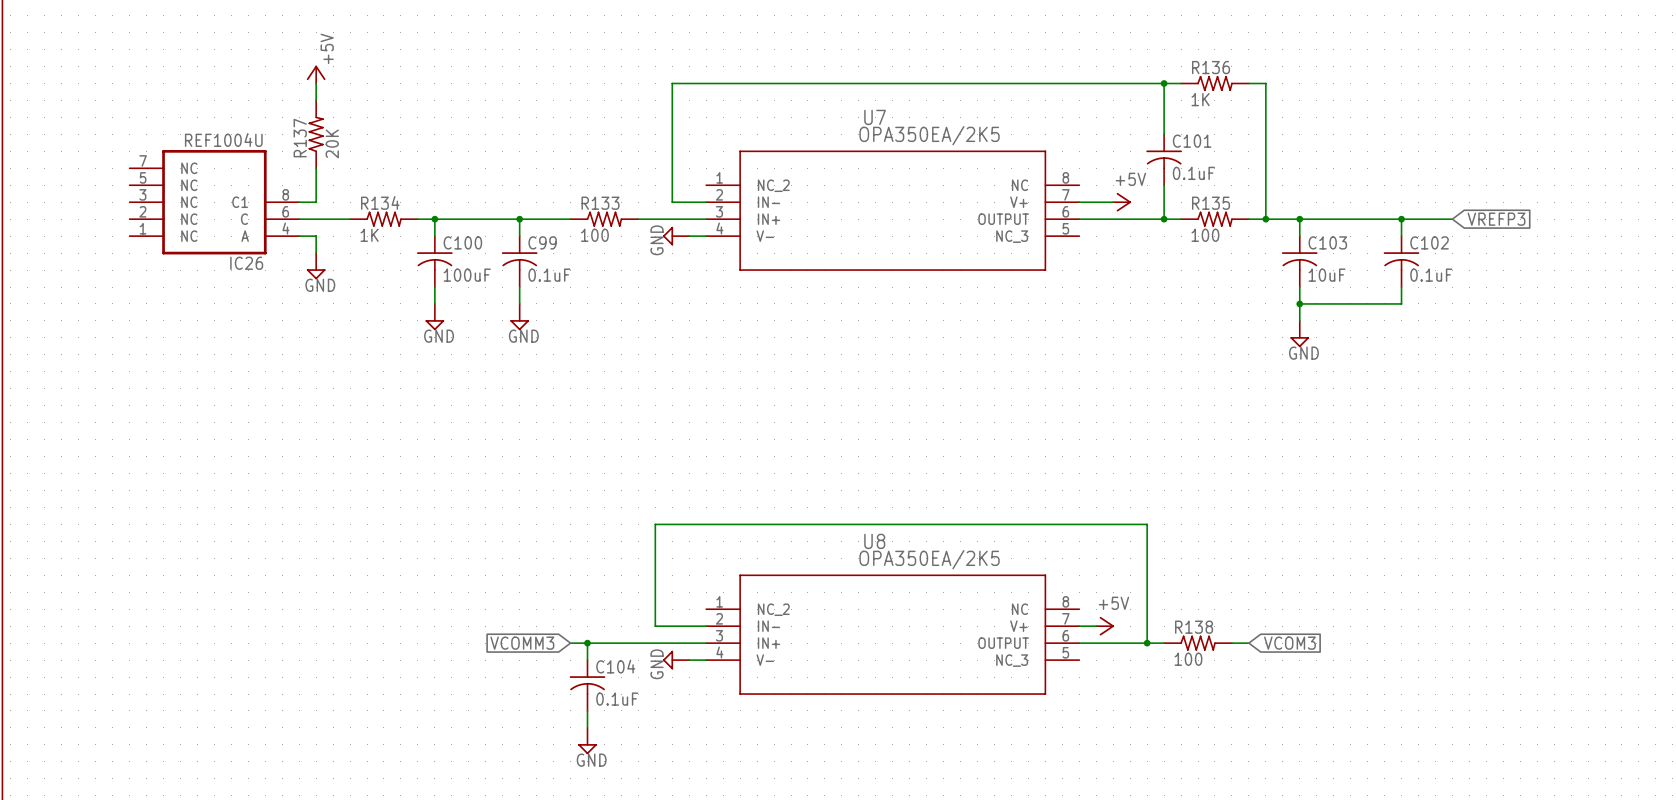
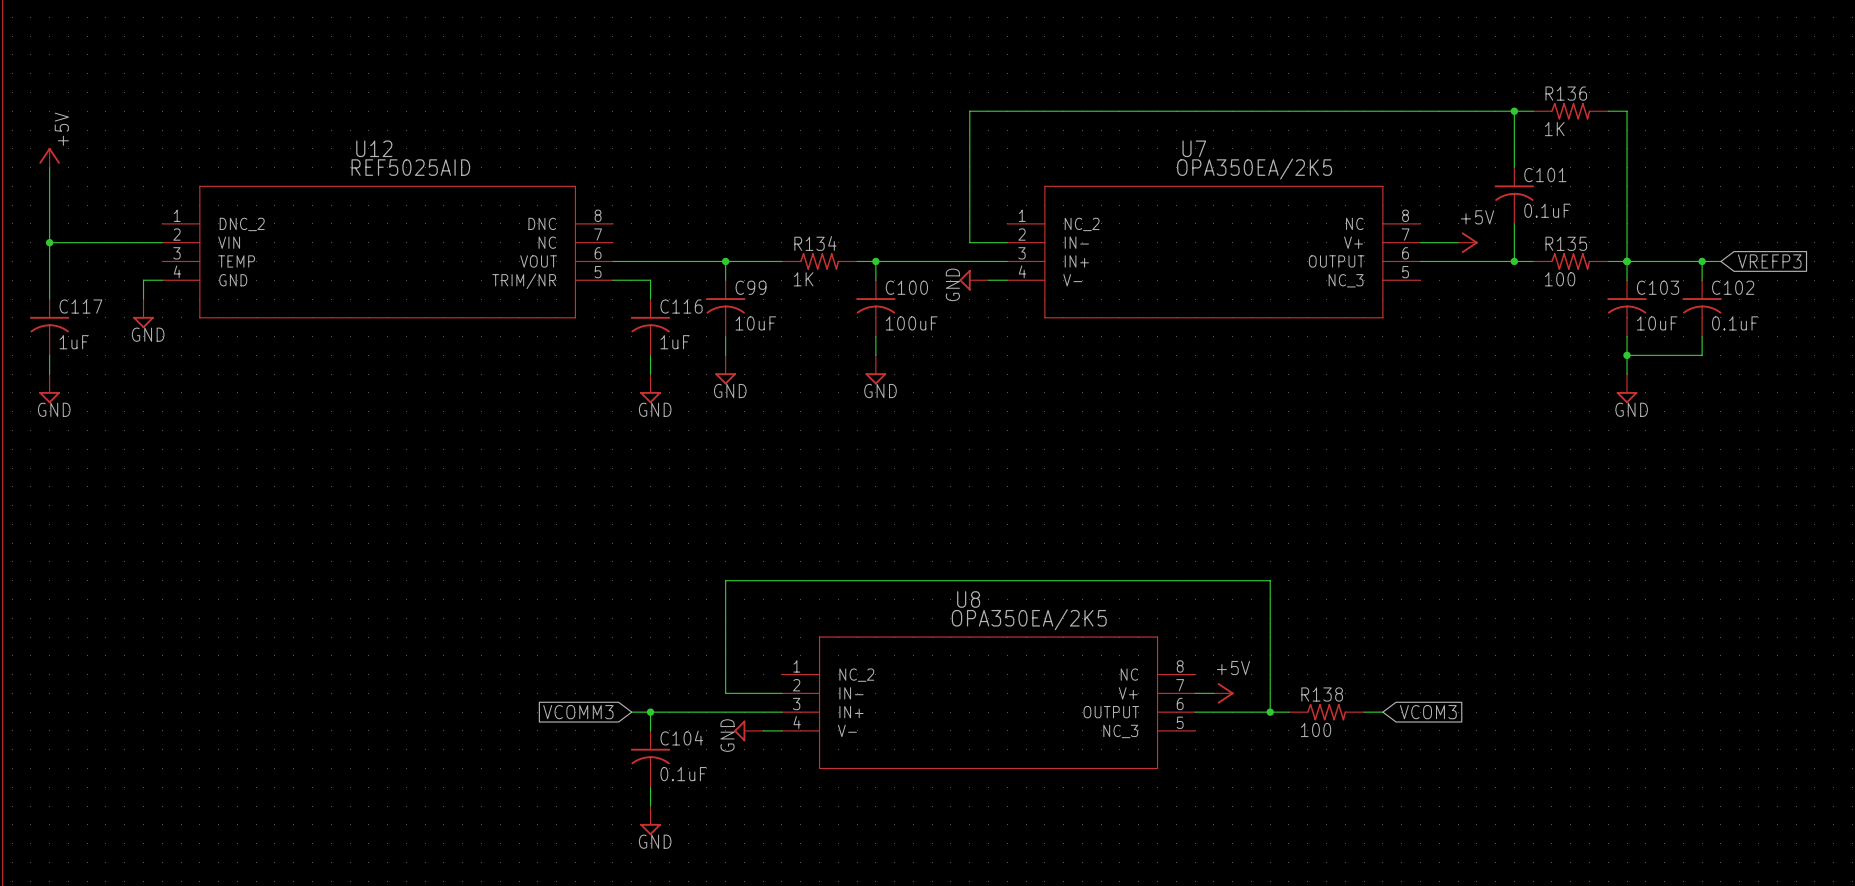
power symbol: +5V (316, 74) -> none
wire: (316, 83) (316, 100) -> none
wire: (1164, 83) (1164, 134) -> none
junction: (1164, 83) -> none
wire: (1181, 83) (672, 83) (672, 202) (706, 202) -> none
R136 position: (1214, 83) -> (1570, 111)
wire: (1248, 83) (1265, 83) (1265, 219) -> none
wire: none -> (1514, 111) (1514, 167)
junction: none -> (1514, 111)
wire: none -> (1533, 111) (969, 111) (969, 242) (1007, 242)
wire: none -> (1608, 111) (1627, 111) (1627, 280)
R137: 20K (316, 134) -> none
power symbol: none -> +5V (49, 157)
wire: none -> (49, 167) (49, 299)
C101 position: (1164, 159) -> (1514, 195)
wire: (316, 168) (316, 202) (299, 202) -> none
wire: (1164, 185) (1164, 219) -> none
IC26: REF1004U (214, 202) -> none
wire: (1079, 202) (1113, 202) -> none
power symbol: +5V (1122, 202) -> none
U7 position: (892, 210) -> (1213, 252)
wire: none -> (49, 242) (162, 242)
junction: none -> (49, 242)
wire: (299, 219) (350, 219) -> none
R134 position: (383, 219) -> (819, 261)
wire: (417, 219) (570, 219) -> none
wire: (434, 219) (434, 236) -> none
junction: (434, 219) -> none
junction: (519, 219) -> none
R133: 100 (604, 219) -> none
wire: (638, 219) (706, 219) -> none
wire: (1079, 219) (1181, 219) -> none
junction: (1164, 219) -> none
R135 position: (1214, 219) -> (1570, 261)
junction: (1265, 219) -> none
wire: (1299, 219) (1299, 236) -> none
junction: (1299, 219) -> none
wire: (1316, 219) (1452, 219) -> none
power symbol: none -> +5V (1467, 242)
wire: (1401, 219) (1401, 236) -> (1702, 261) (1702, 280)
junction: (1401, 219) -> none
global label position: VREFP3 (1496, 219) -> VREFP3 (1769, 261)
U12: none -> REF5025AID (387, 252)
wire: (299, 236) (316, 236) (316, 253) -> none
wire: none -> (612, 261) (763, 261)
junction: none -> (725, 261)
power symbol: GND (676, 236) -> none
wire: none -> (857, 261) (1007, 261)
wire: none -> (875, 261) (875, 280)
junction: none -> (875, 261)
wire: none -> (1420, 261) (1533, 261)
junction: none -> (1514, 261)
wire: none -> (1608, 261) (1720, 261)
junction: none -> (1627, 261)
junction: none -> (1702, 261)
wire: none -> (162, 280) (143, 280) (143, 299)
wire: none -> (612, 280) (650, 280) (650, 299)
power symbol: none -> GND (973, 280)
wire: none -> (988, 280) (1007, 280)
C100 position: (434, 261) -> (875, 308)
C99 position: (519, 261) -> (725, 308)
C103 position: (1299, 261) -> (1627, 308)
C102 position: (1401, 261) -> (1702, 308)
power symbol: GND (316, 266) -> none
C99 value: 0.1uF (549, 275) -> 10uF (755, 323)
power symbol: none -> GND (143, 313)
wire: (434, 287) (434, 303) -> (650, 355) (650, 374)
wire: (519, 287) (519, 303) -> (725, 336) (725, 355)
wire: (1299, 287) (1299, 320) -> (1514, 223) (1514, 261)
wire: (1401, 287) (1401, 303) (1299, 303) -> none
C117: none -> 1uF (49, 327)
C116: none -> 1uF (650, 327)
wire: none -> (875, 336) (875, 355)
junction: (1299, 303) -> none
wire: none -> (1627, 336) (1627, 374)
wire: none -> (1702, 336) (1702, 355) (1627, 355)
power symbol: GND (434, 317) -> none
power symbol: GND (519, 317) -> none
wire: none -> (49, 355) (49, 374)
junction: none -> (1627, 355)
power symbol: none -> GND (725, 369)
power symbol: none -> GND (875, 369)
power symbol: GND (1299, 334) -> none
power symbol: none -> GND (49, 388)
power symbol: none -> GND (650, 388)
power symbol: none -> GND (1627, 388)

